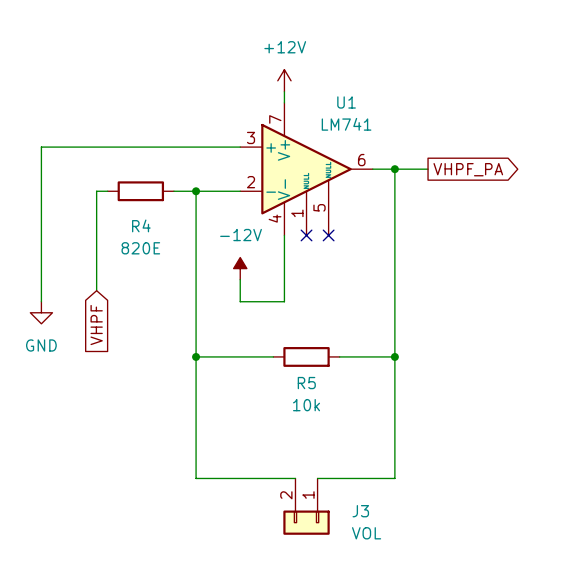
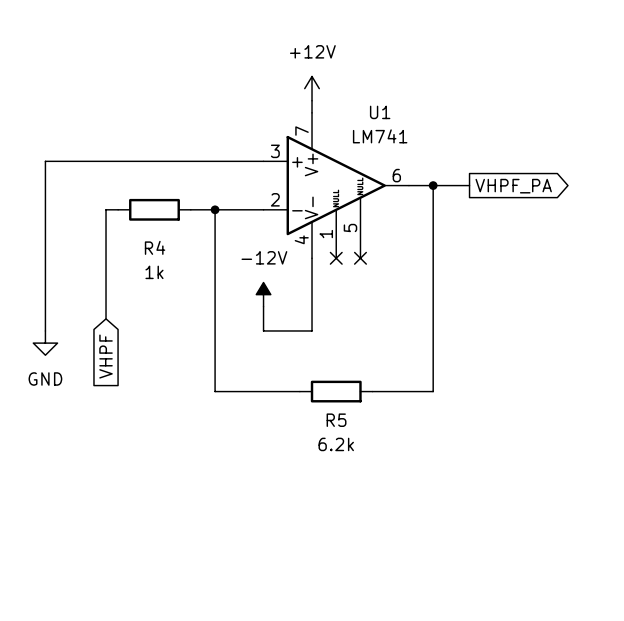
R4 value: 820E (140, 248) -> 1k (154, 272)
wire: (196, 356) (196, 478) (295, 478) -> none
junction: (196, 356) -> none
wire: (394, 356) (394, 478) (317, 478) -> none
junction: (394, 356) -> none
R5 value: 10k (306, 405) -> 6.2k (336, 444)
J3: VOL (306, 506) -> none

